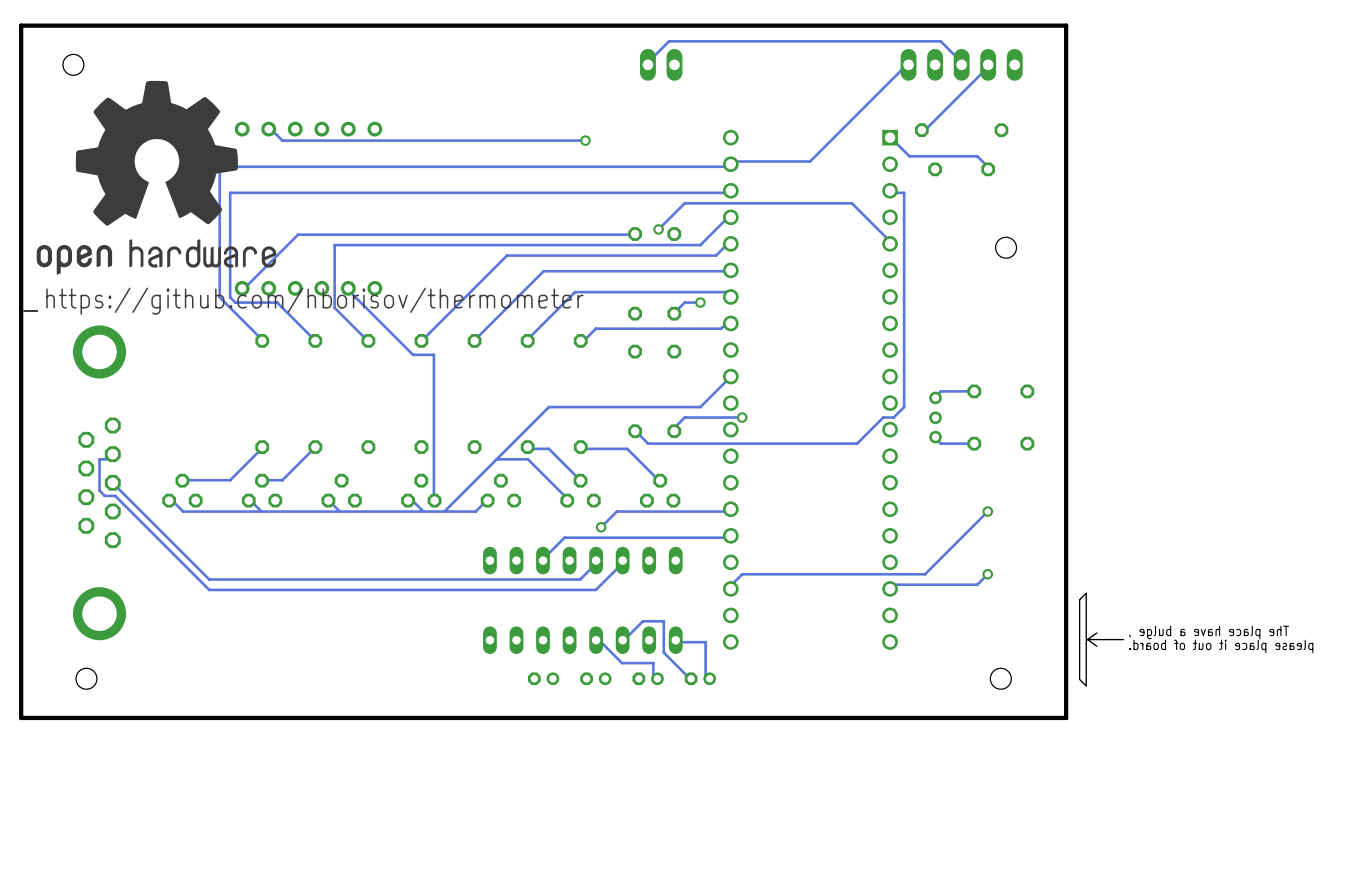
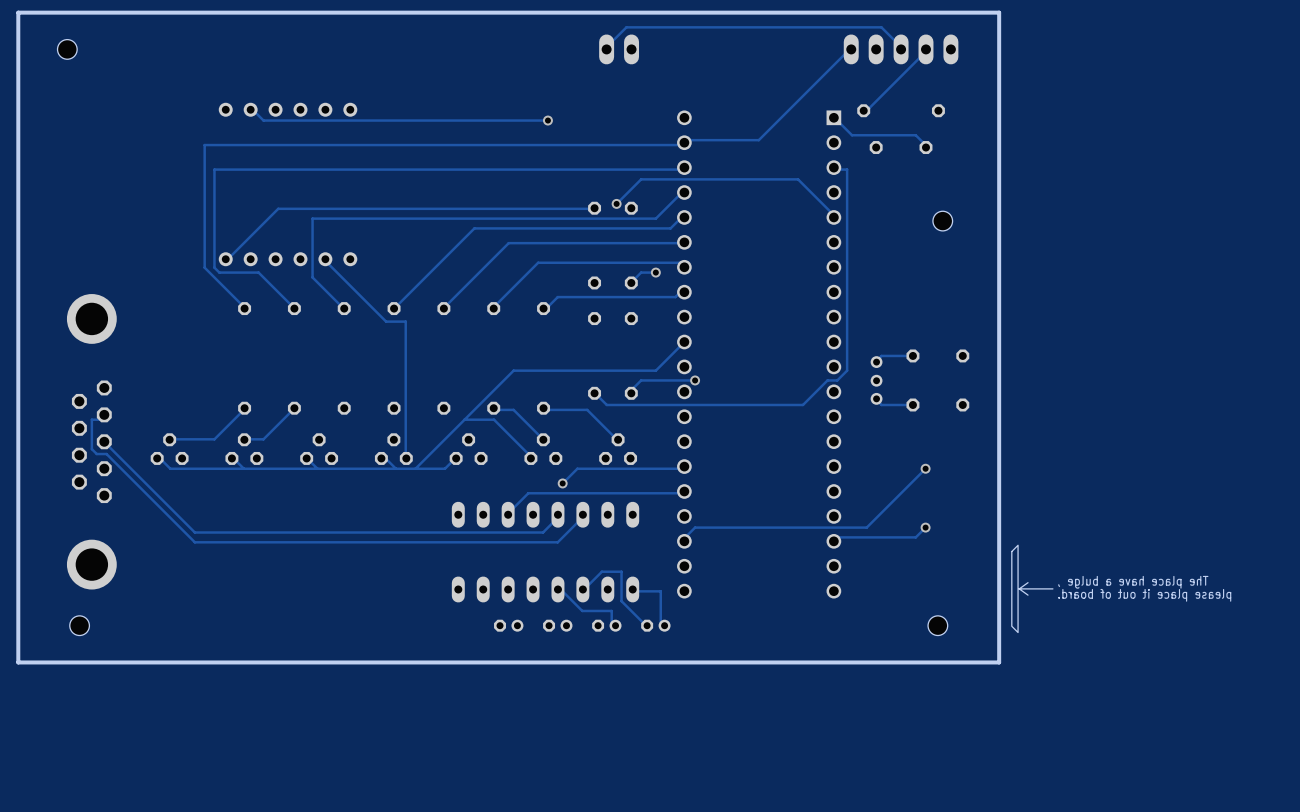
drawing: [36, 80, 277, 275] -> none
text: https://github.com/hborisov/thermometer (314, 301) -> none

